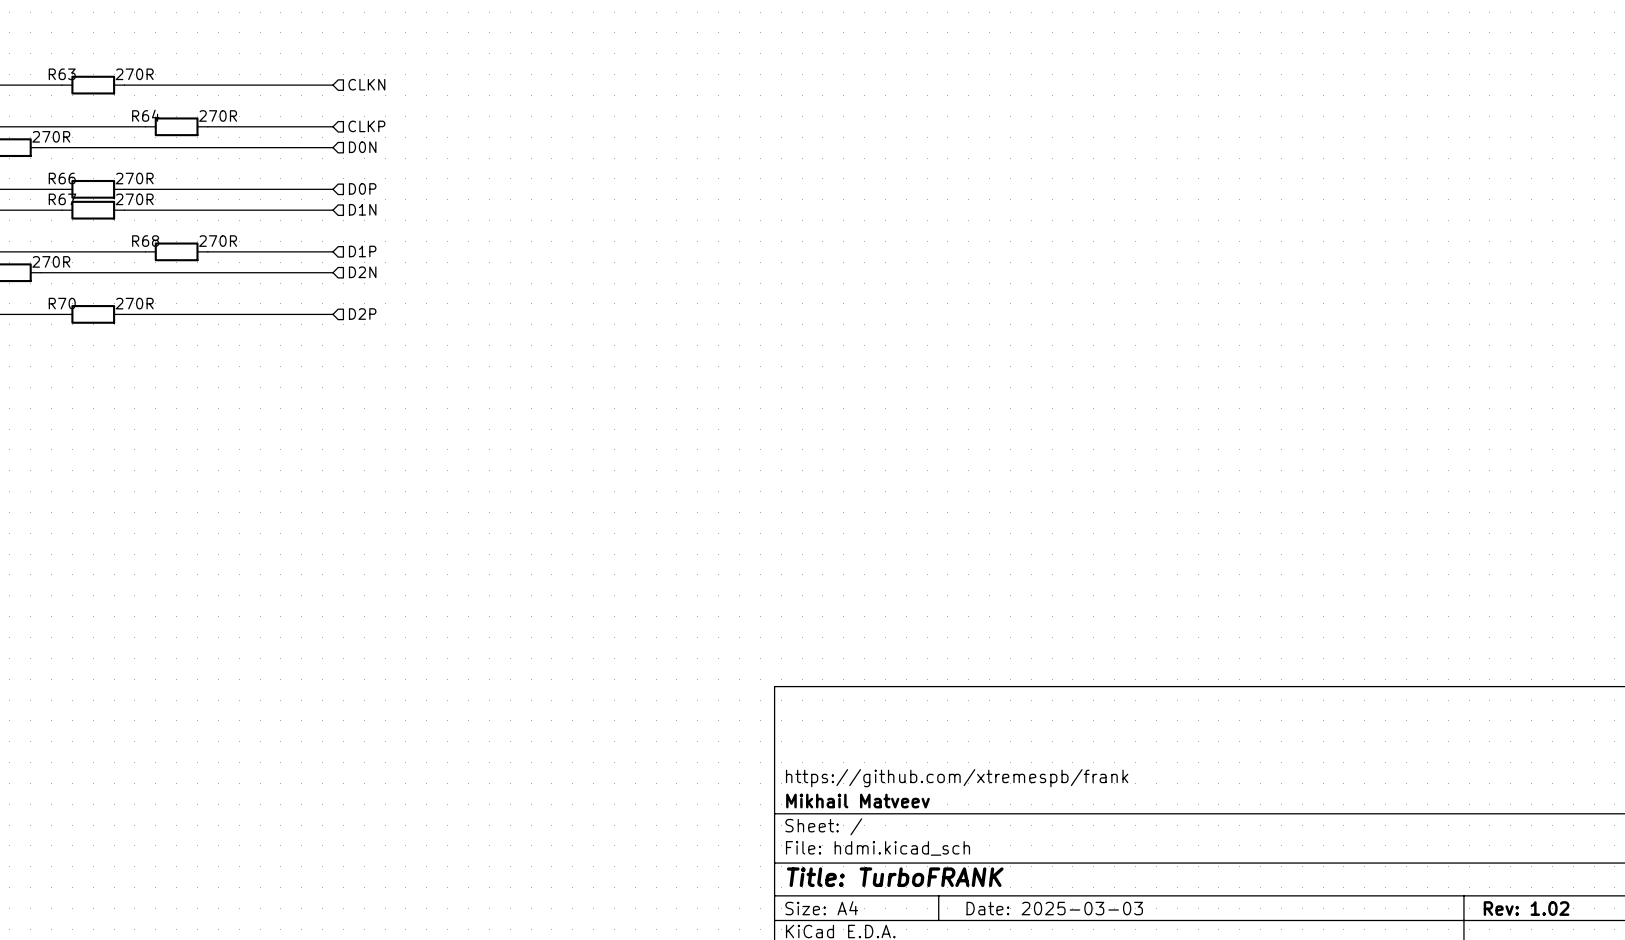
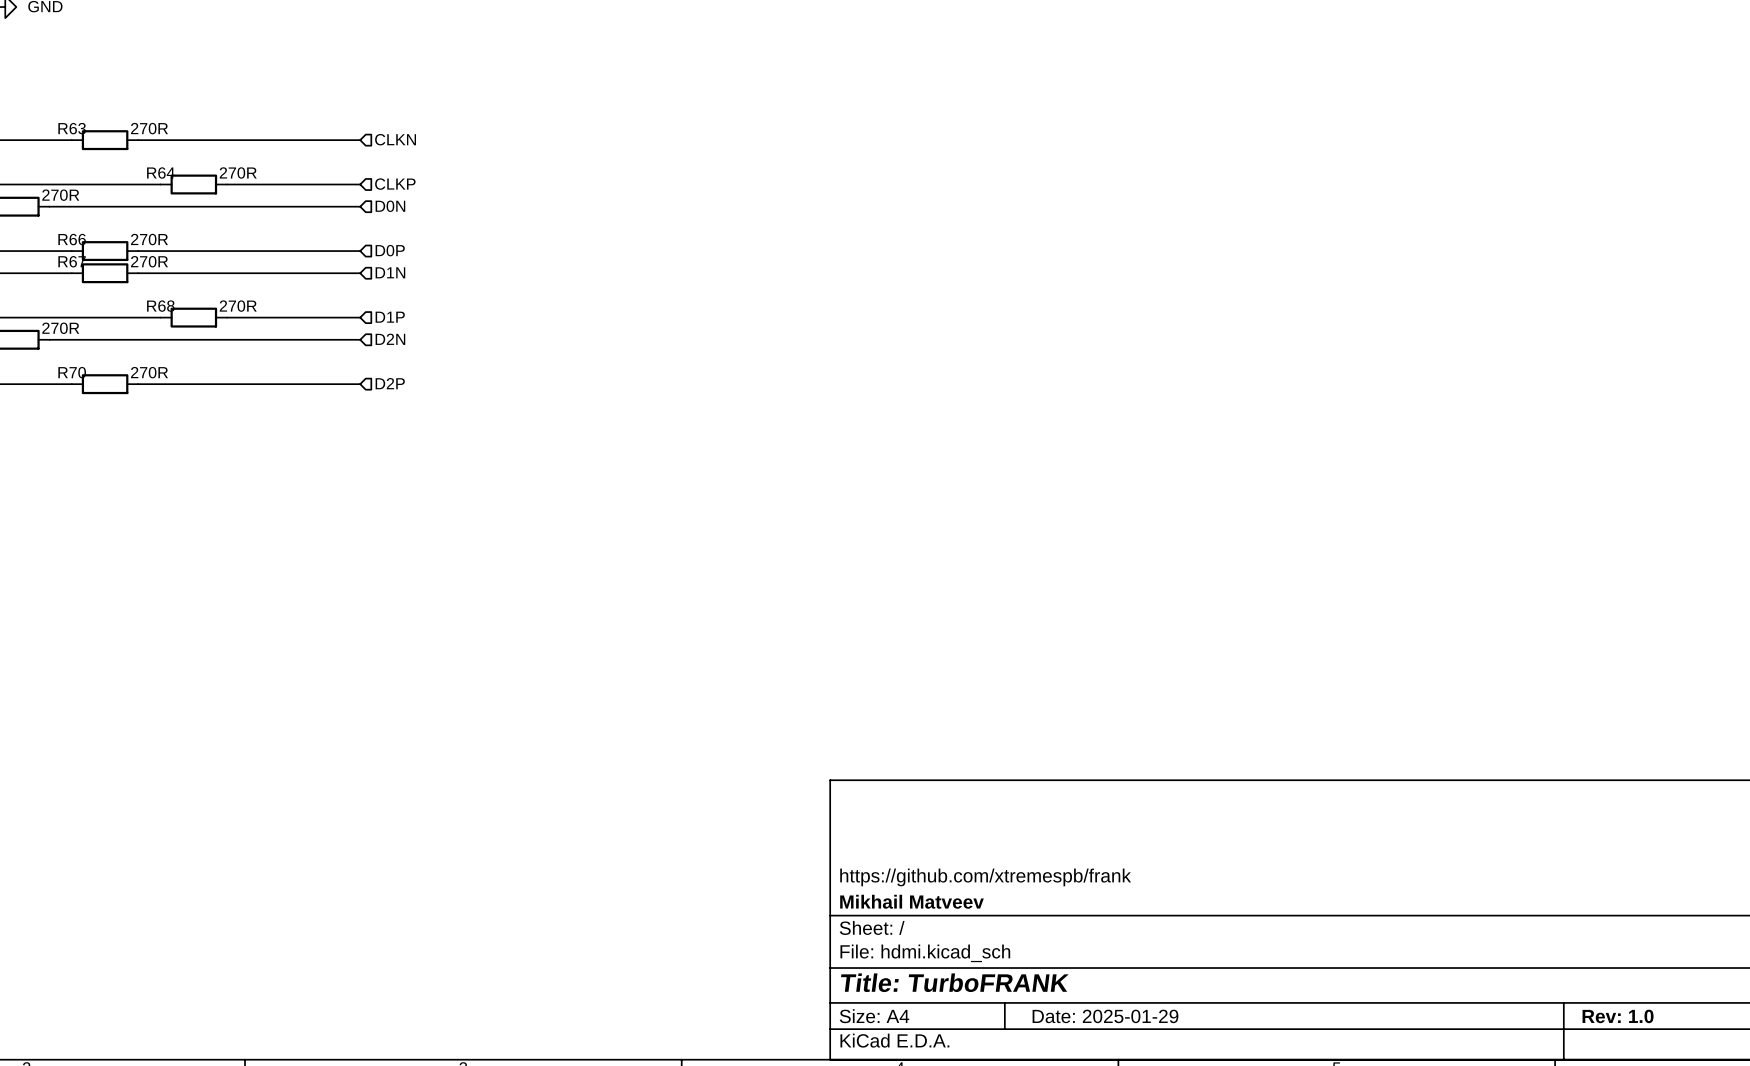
title block: Date: 2025-03-03 (1054, 908) -> Date: 2025-01-29 (1105, 1016)
title block: Rev: 1.02 (1526, 908) -> Rev: 1.0 (1618, 1016)

